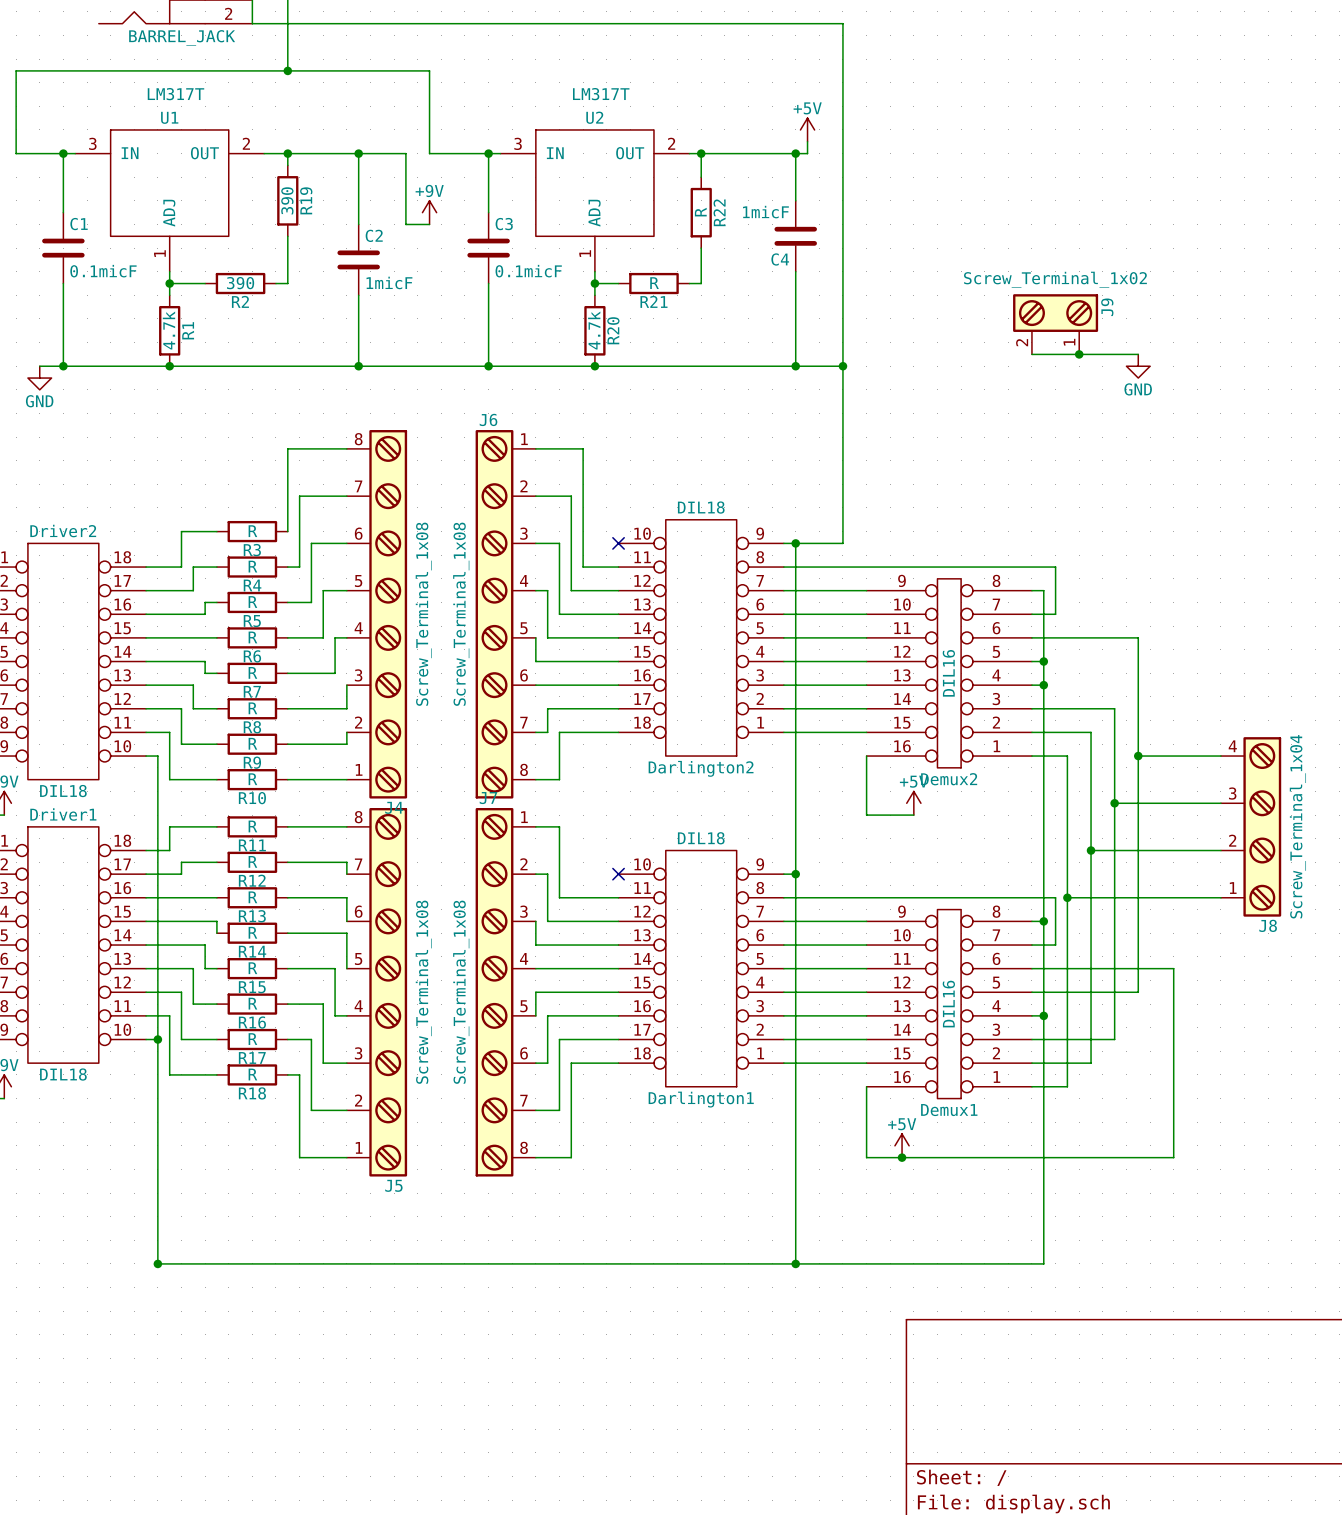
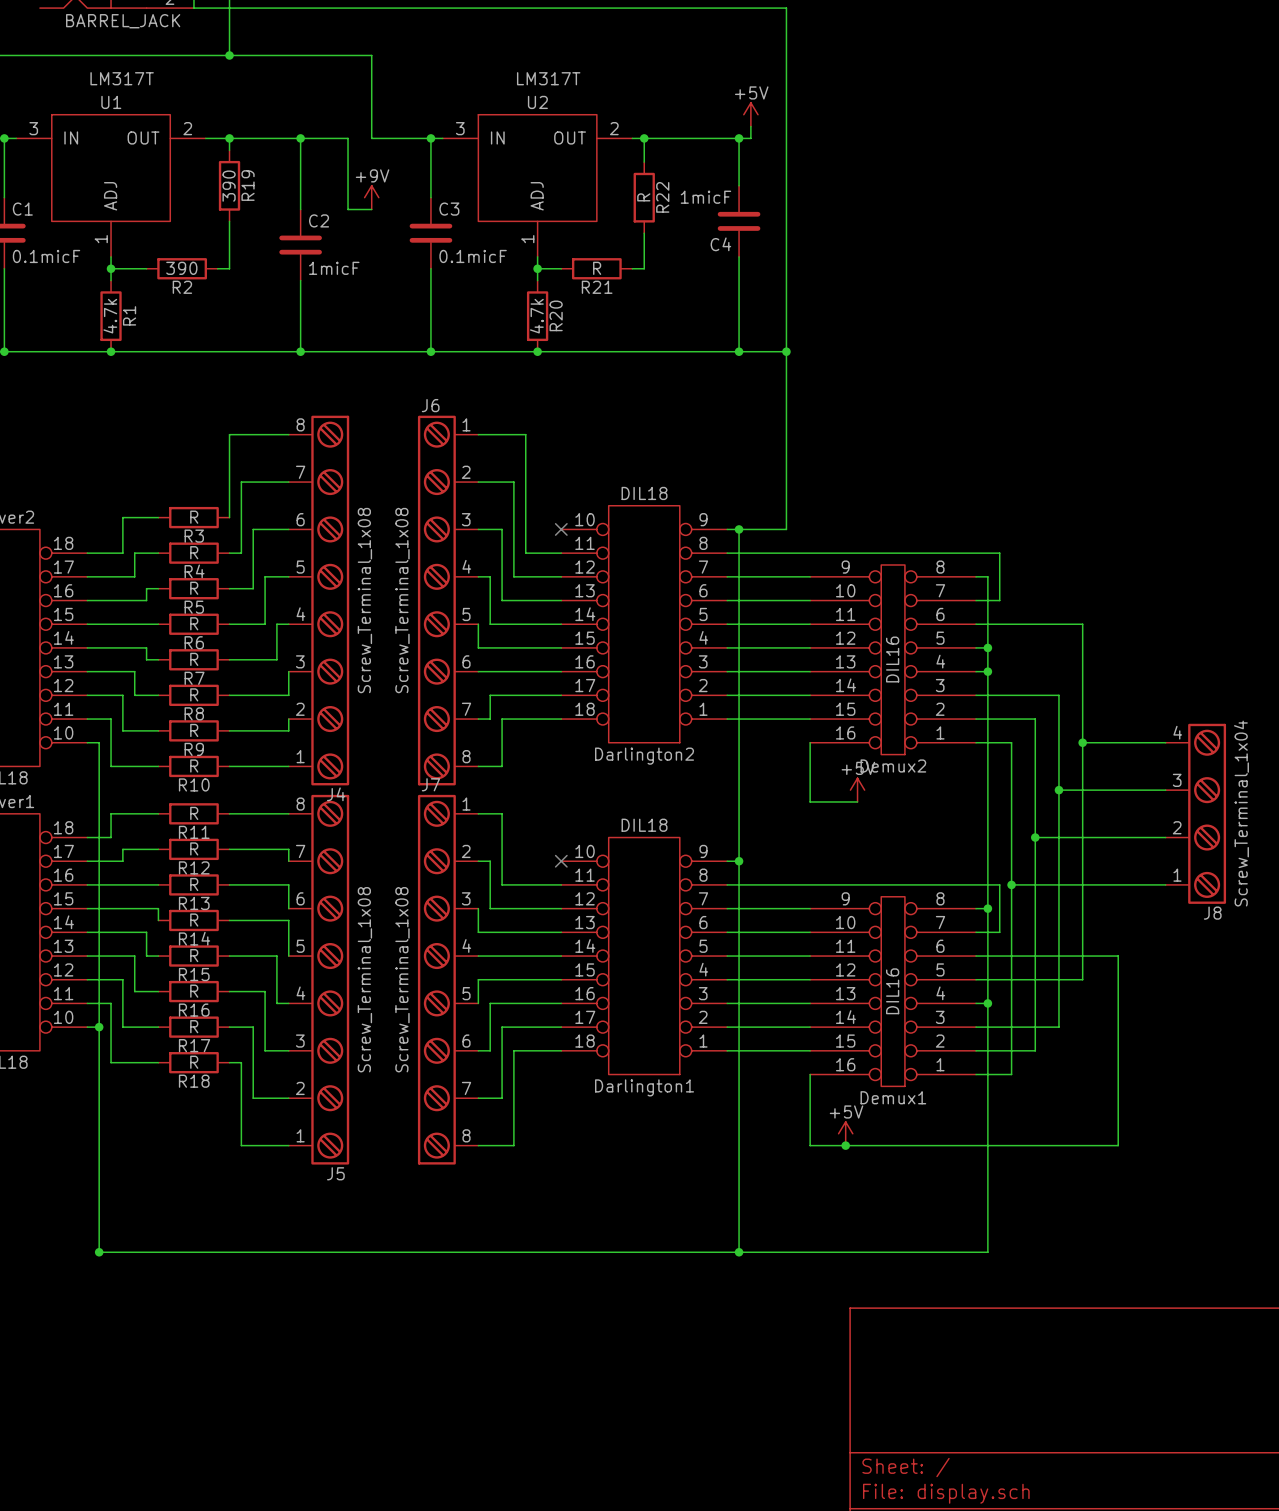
J9: Screw_Terminal_1x02 (1055, 324) -> none
wire: (1031, 354) (1138, 354) -> none
junction: (1079, 354) -> none
power symbol: GND (1138, 366) -> none

